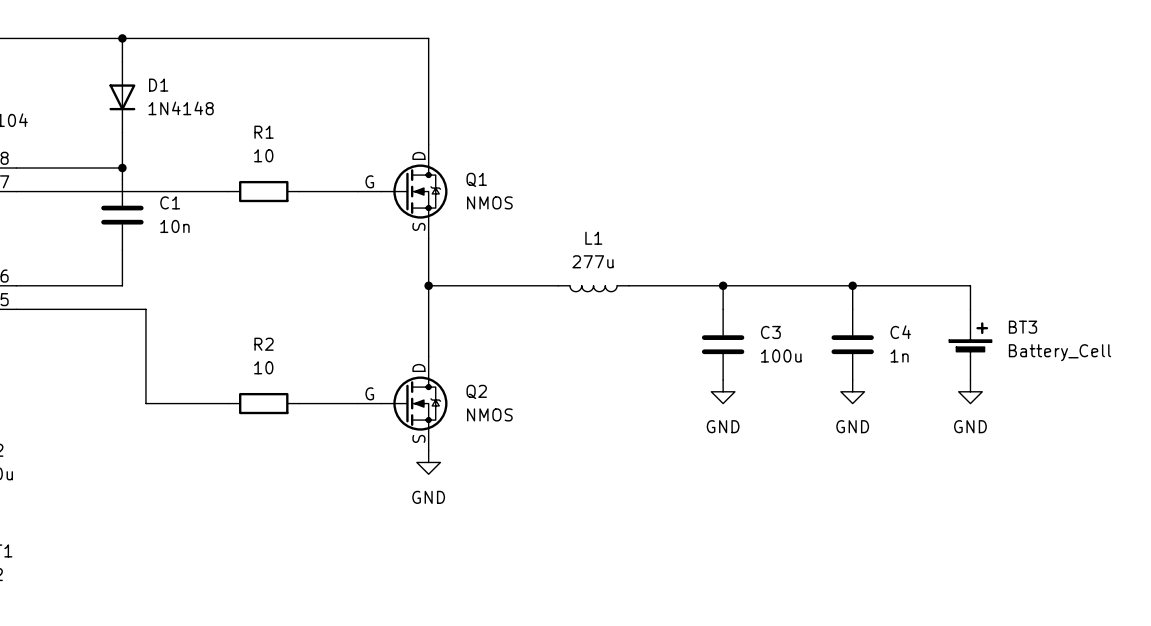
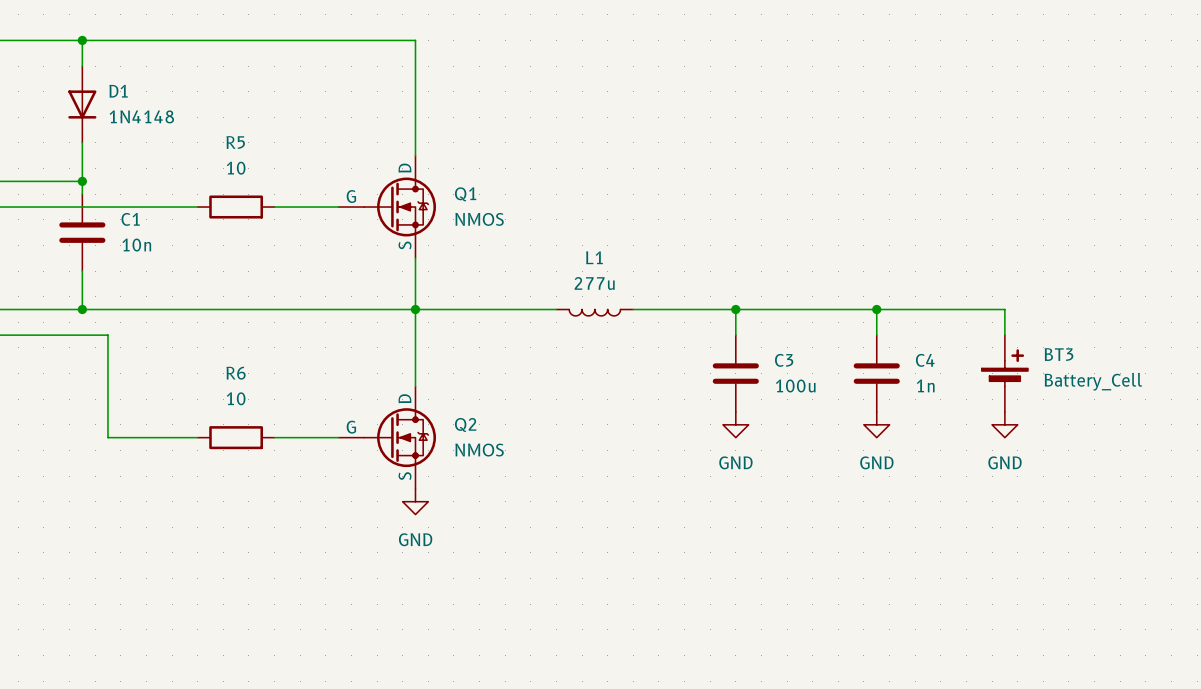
R1 name: R1 (264, 132) -> R5 (235, 142)
wire: none -> (82, 309) (415, 309)
junction: none -> (82, 309)
R2 name: R2 (264, 344) -> R6 (236, 373)

